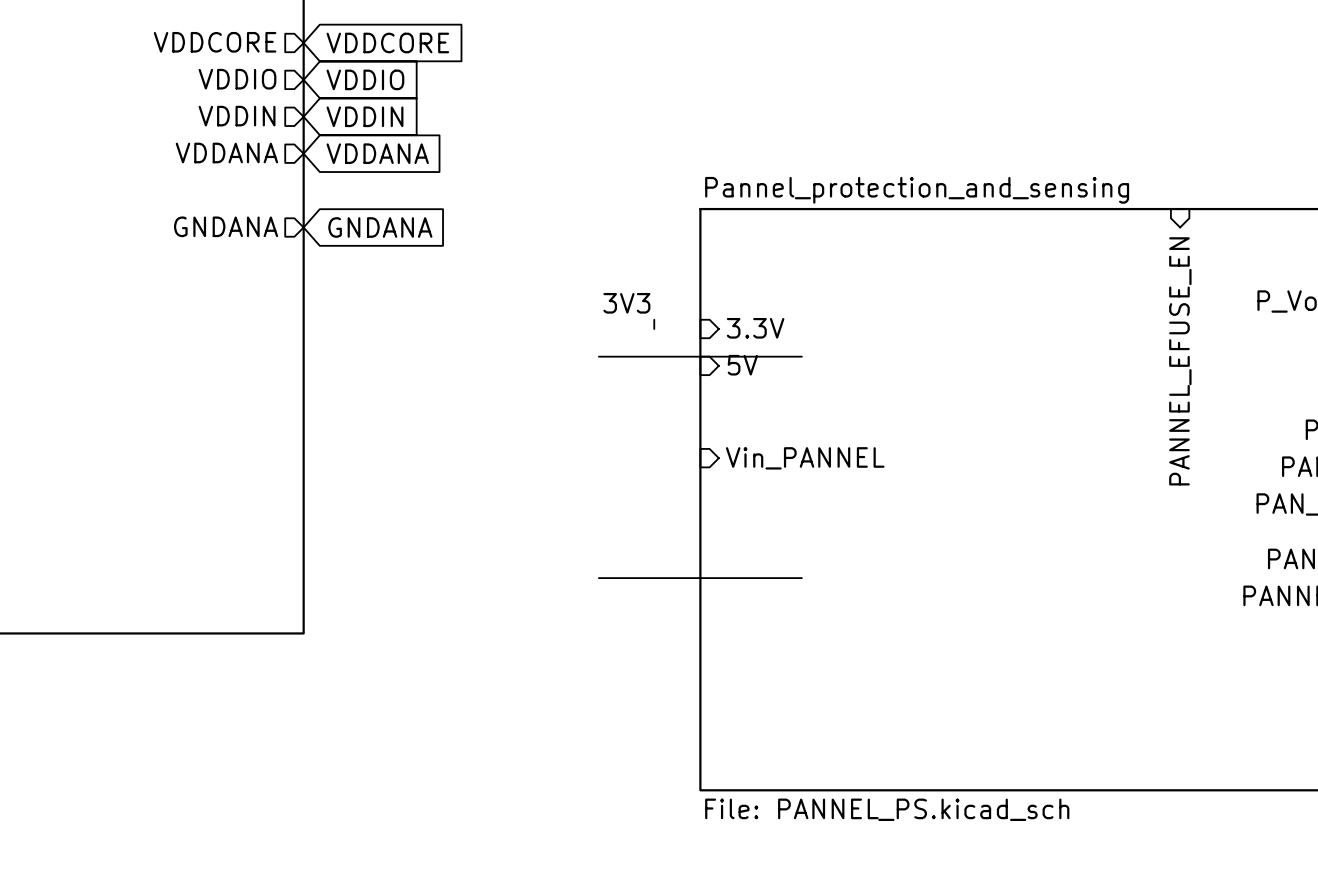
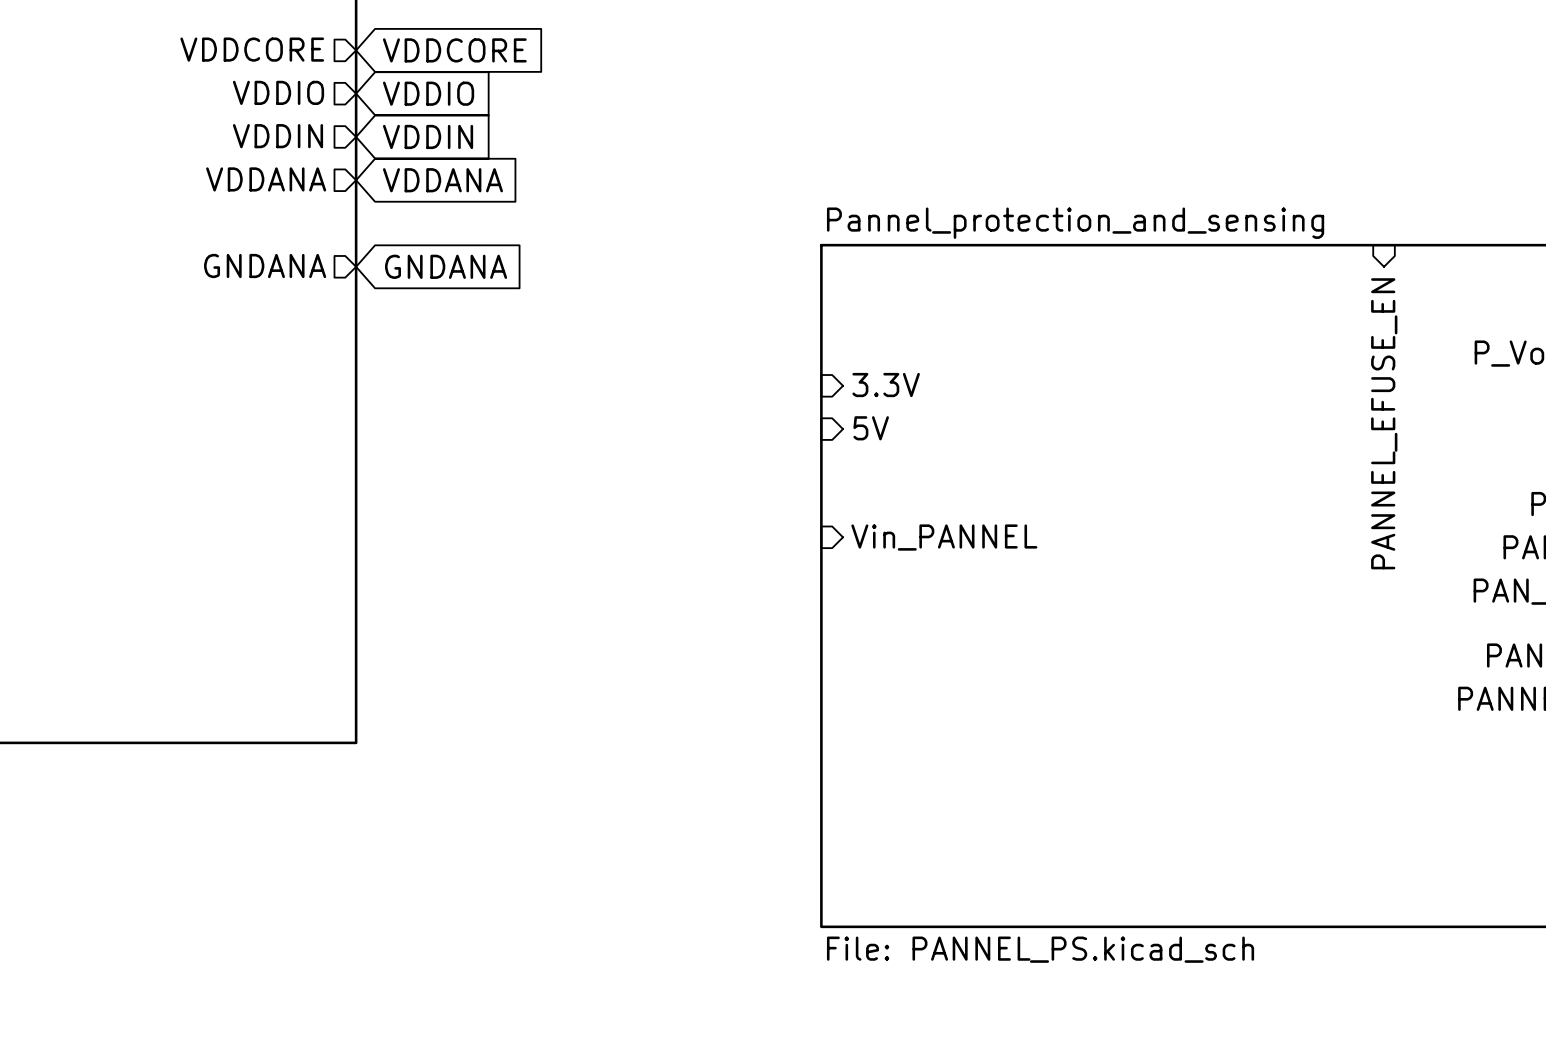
label: 3V3 (626, 303) -> none
wire: (654, 319) (654, 328) -> none
wire: (598, 356) (801, 356) -> none
wire: (598, 578) (801, 578) -> none

